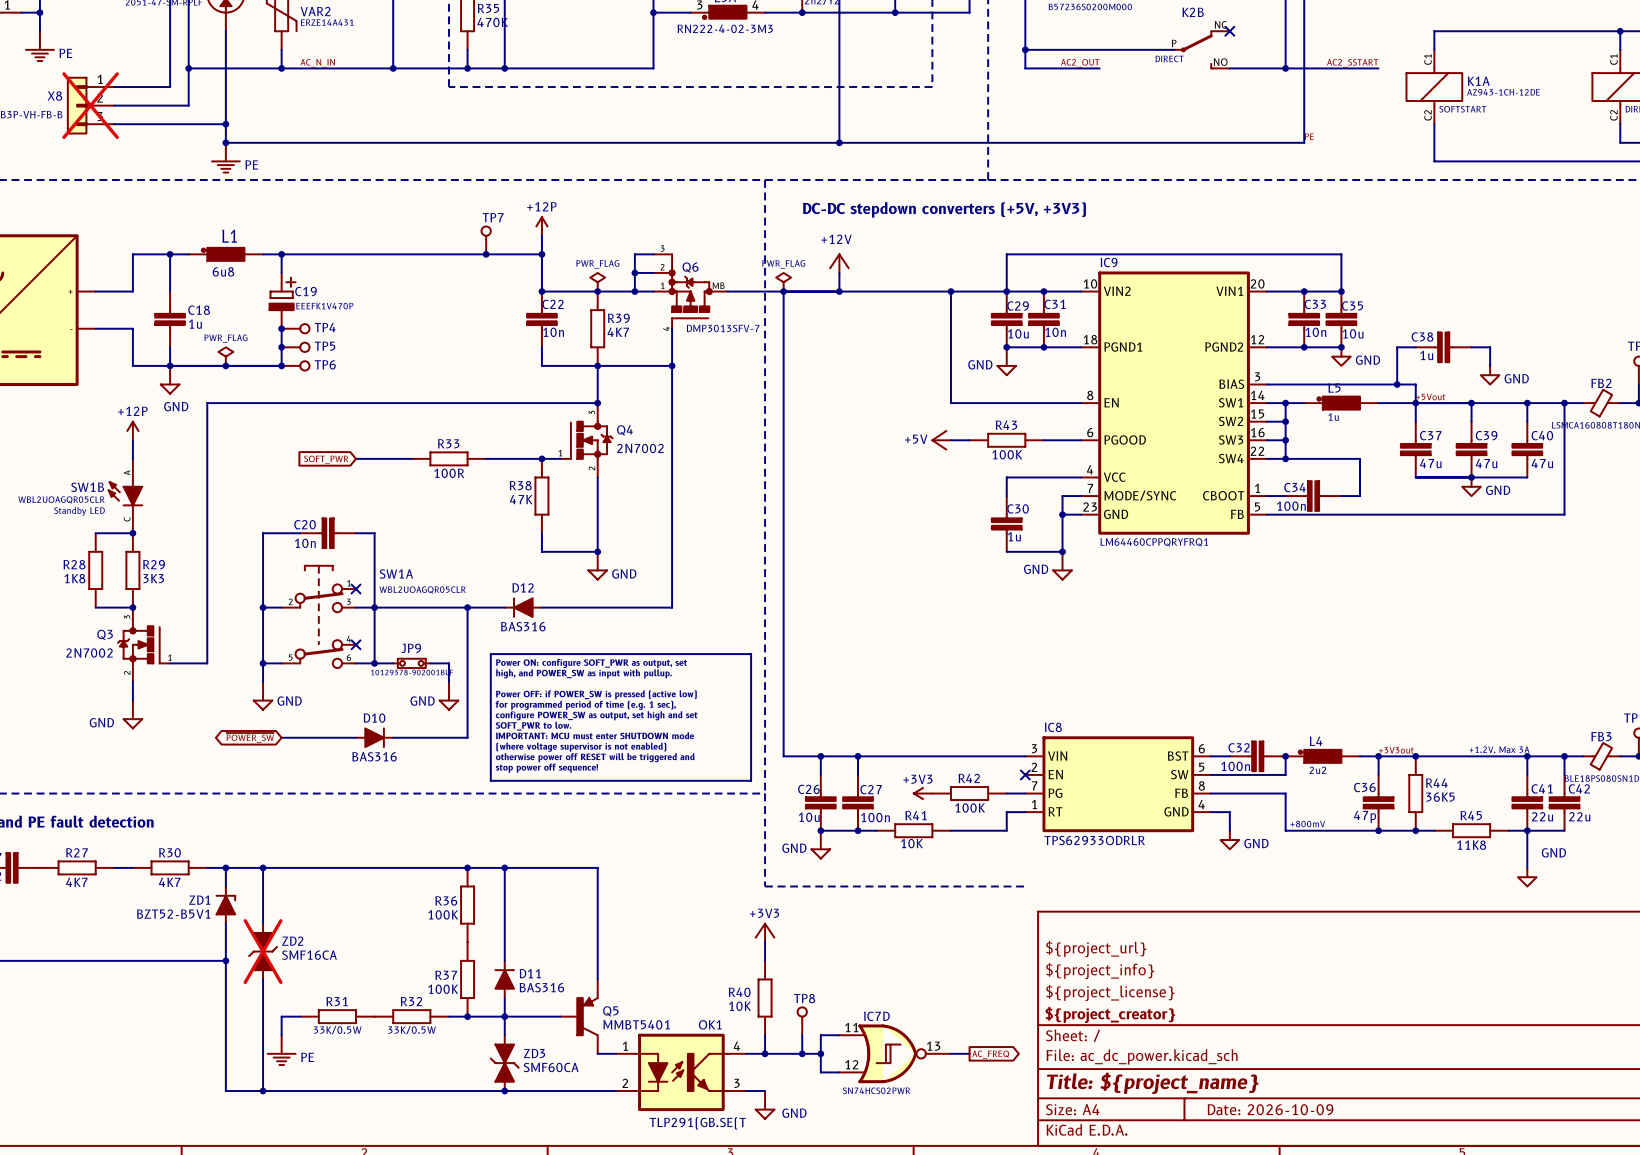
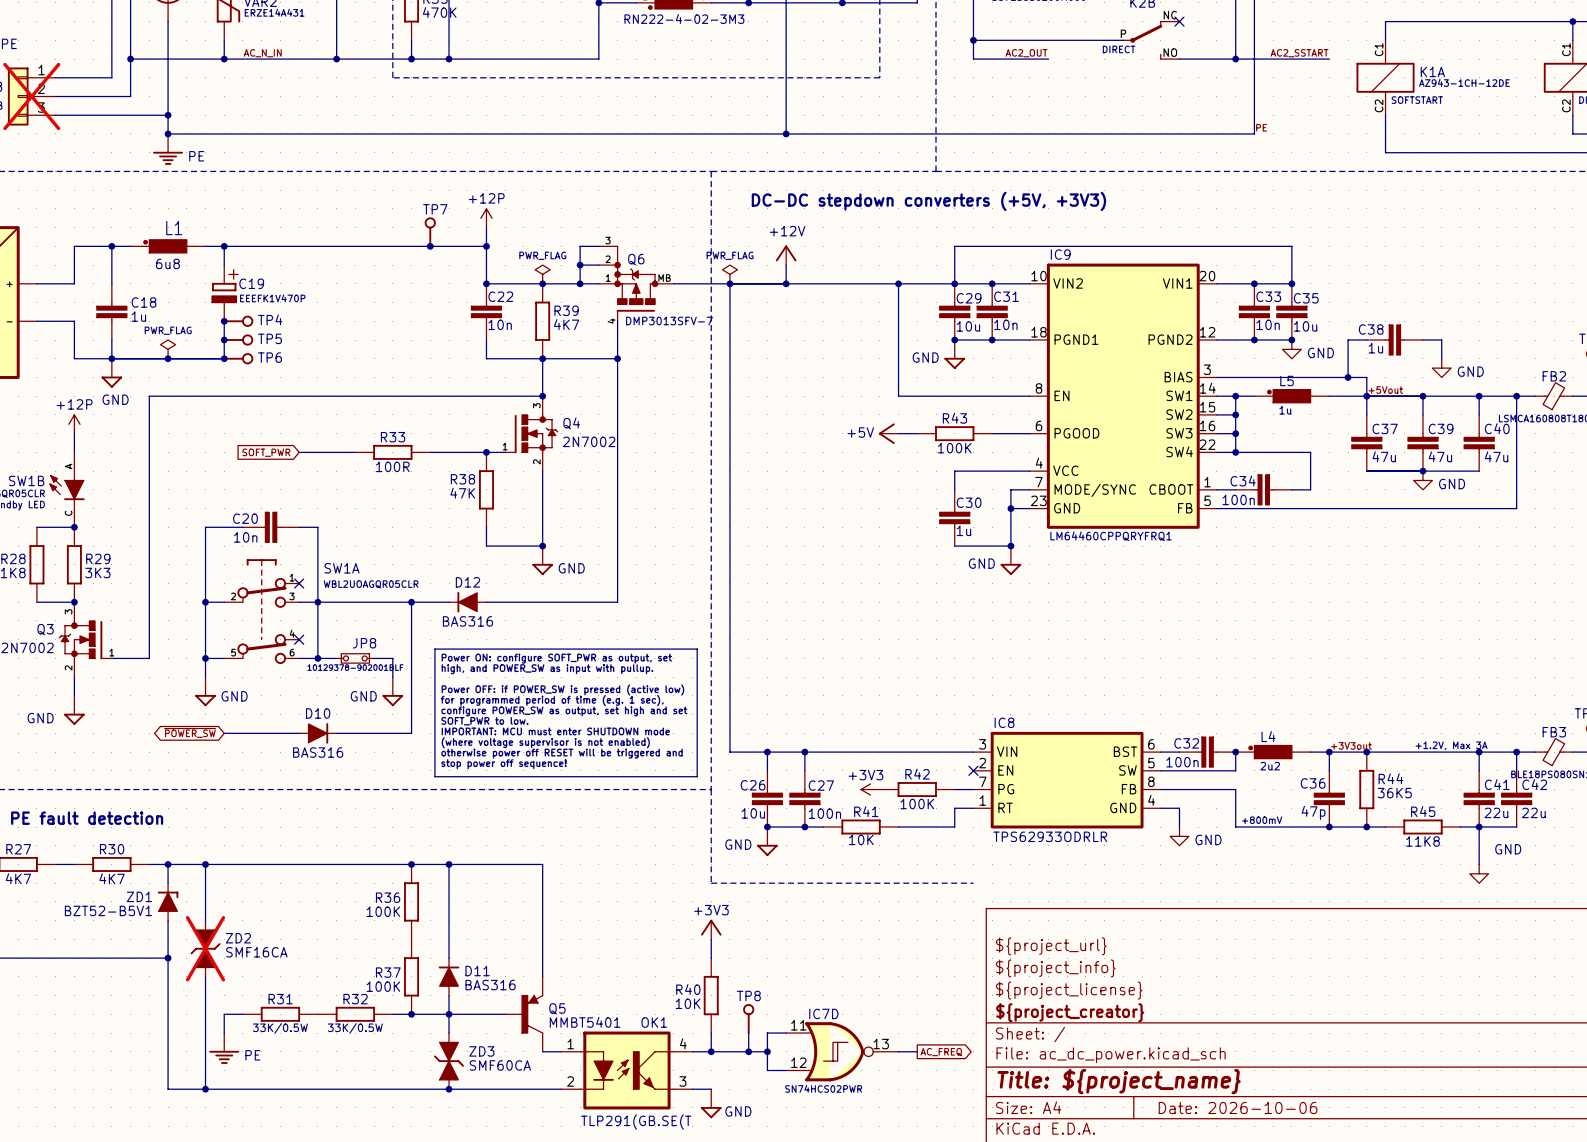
JP9 name: JP9 (411, 648) -> JP8 (364, 643)
title block: Date: 2026-10-09 (1270, 1109) -> Date: 2026-10-06 (1238, 1107)

